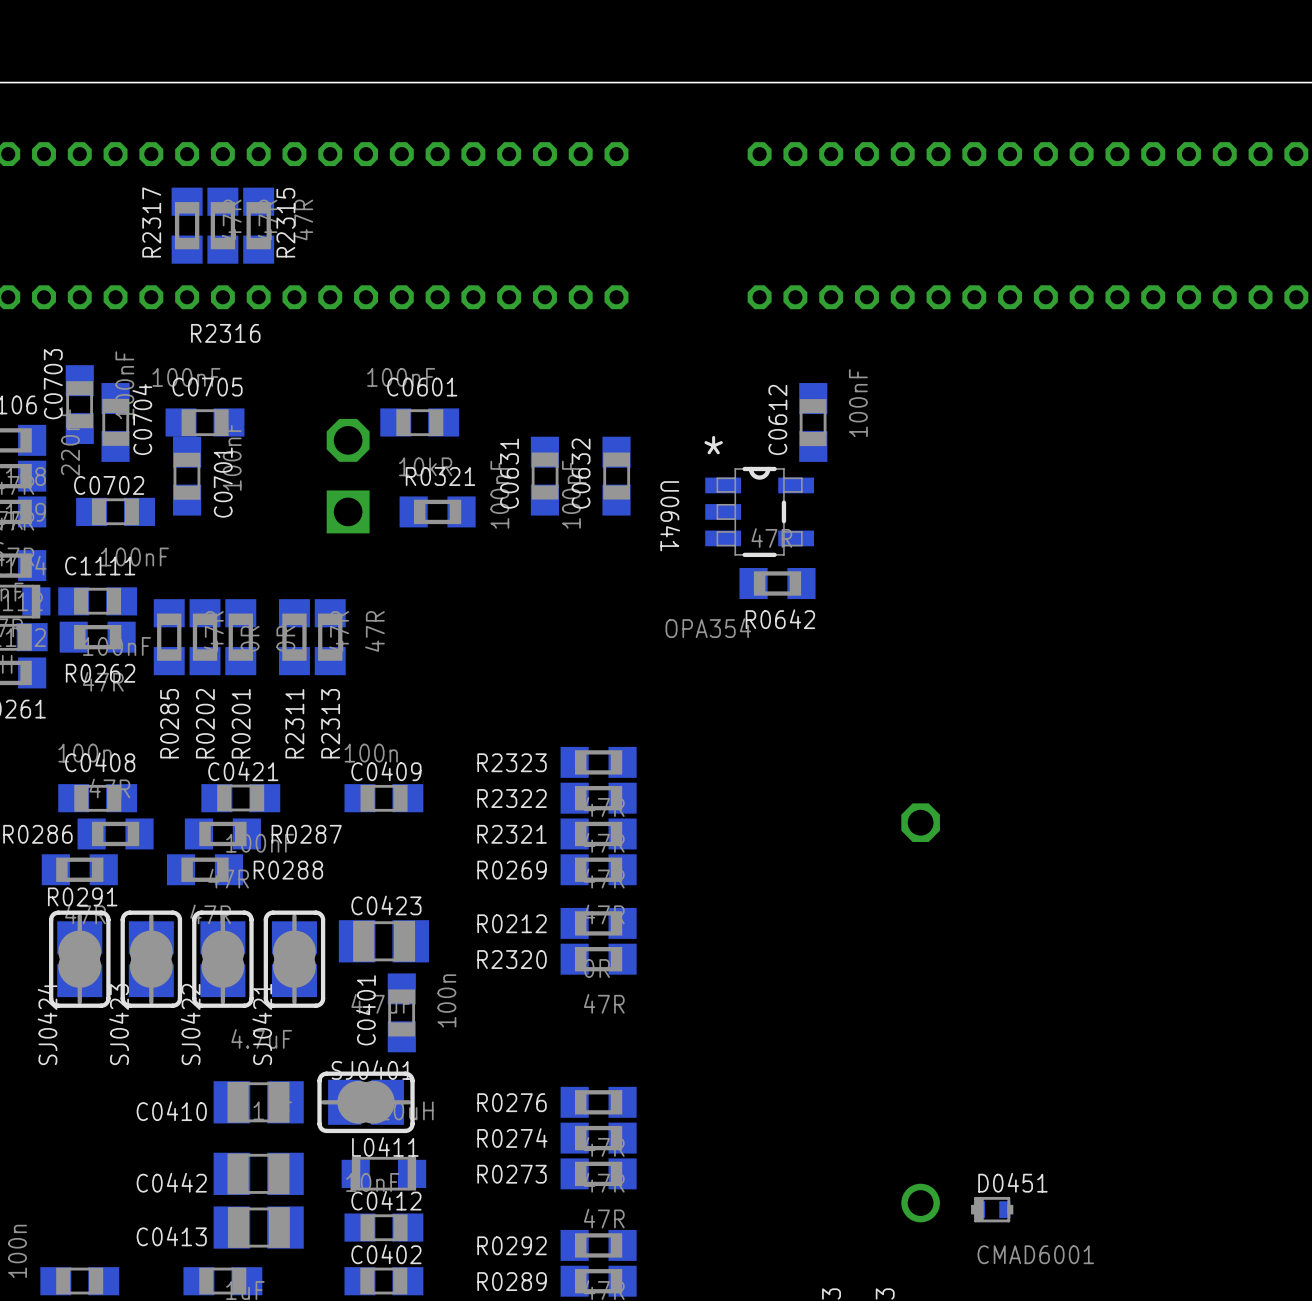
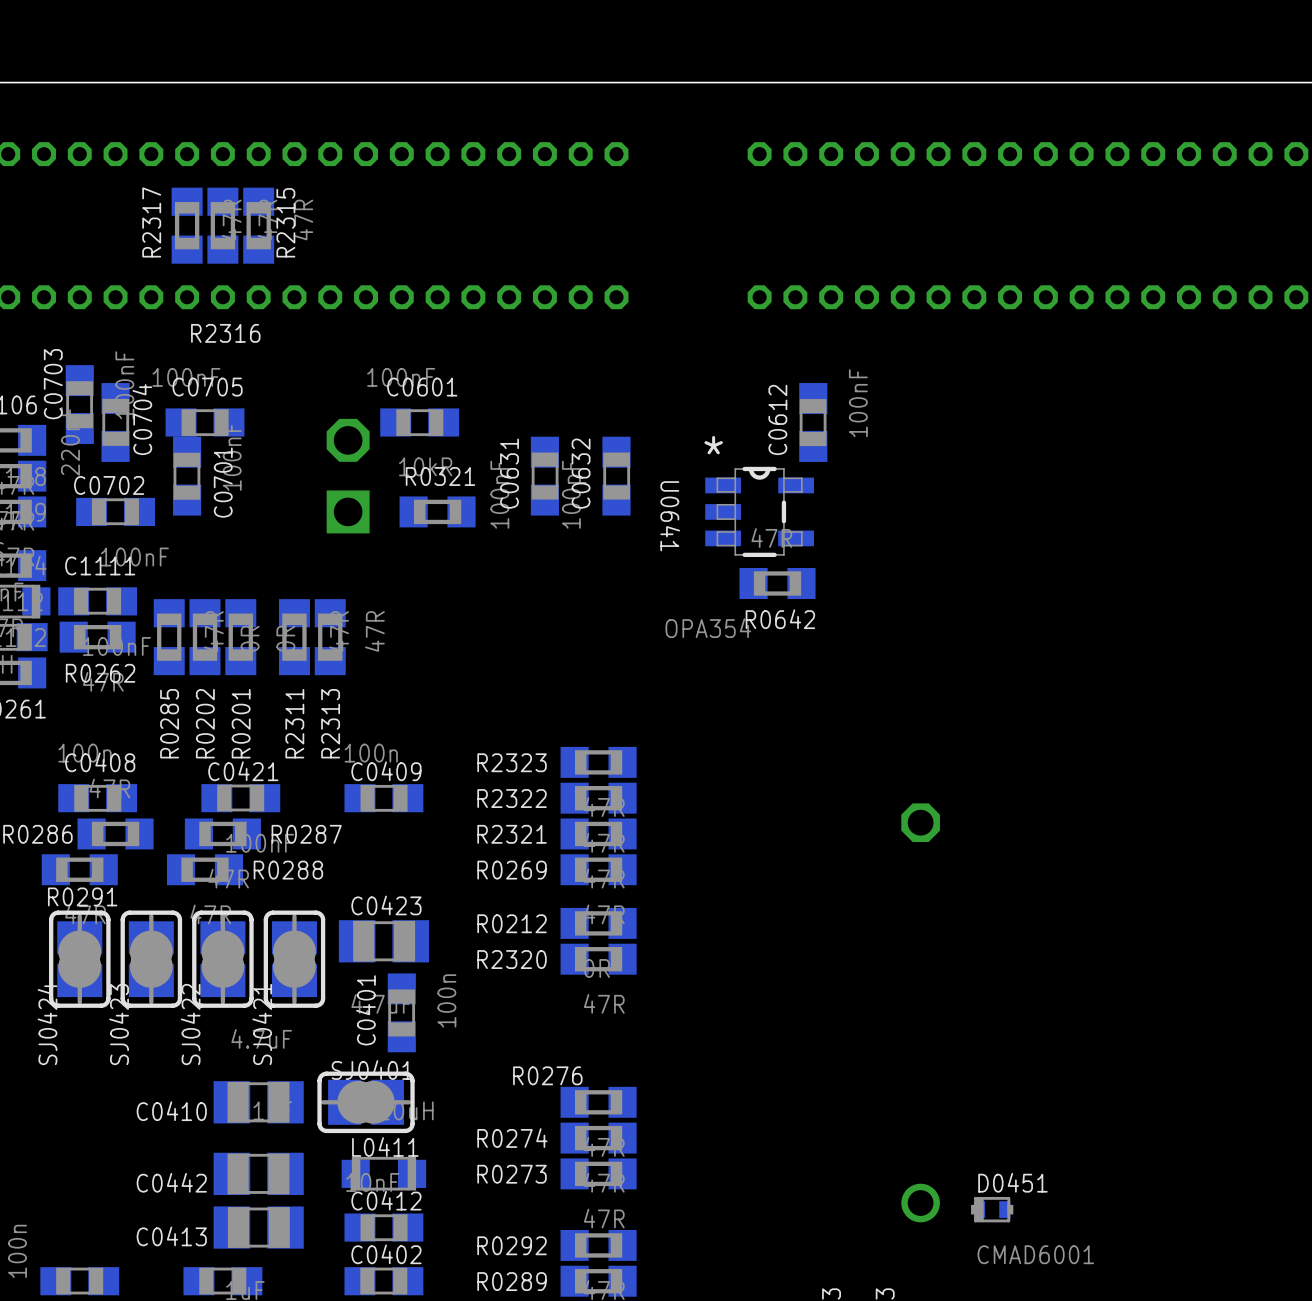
R0276 name position: R0276 (512, 1102) -> R0276 (547, 1075)

